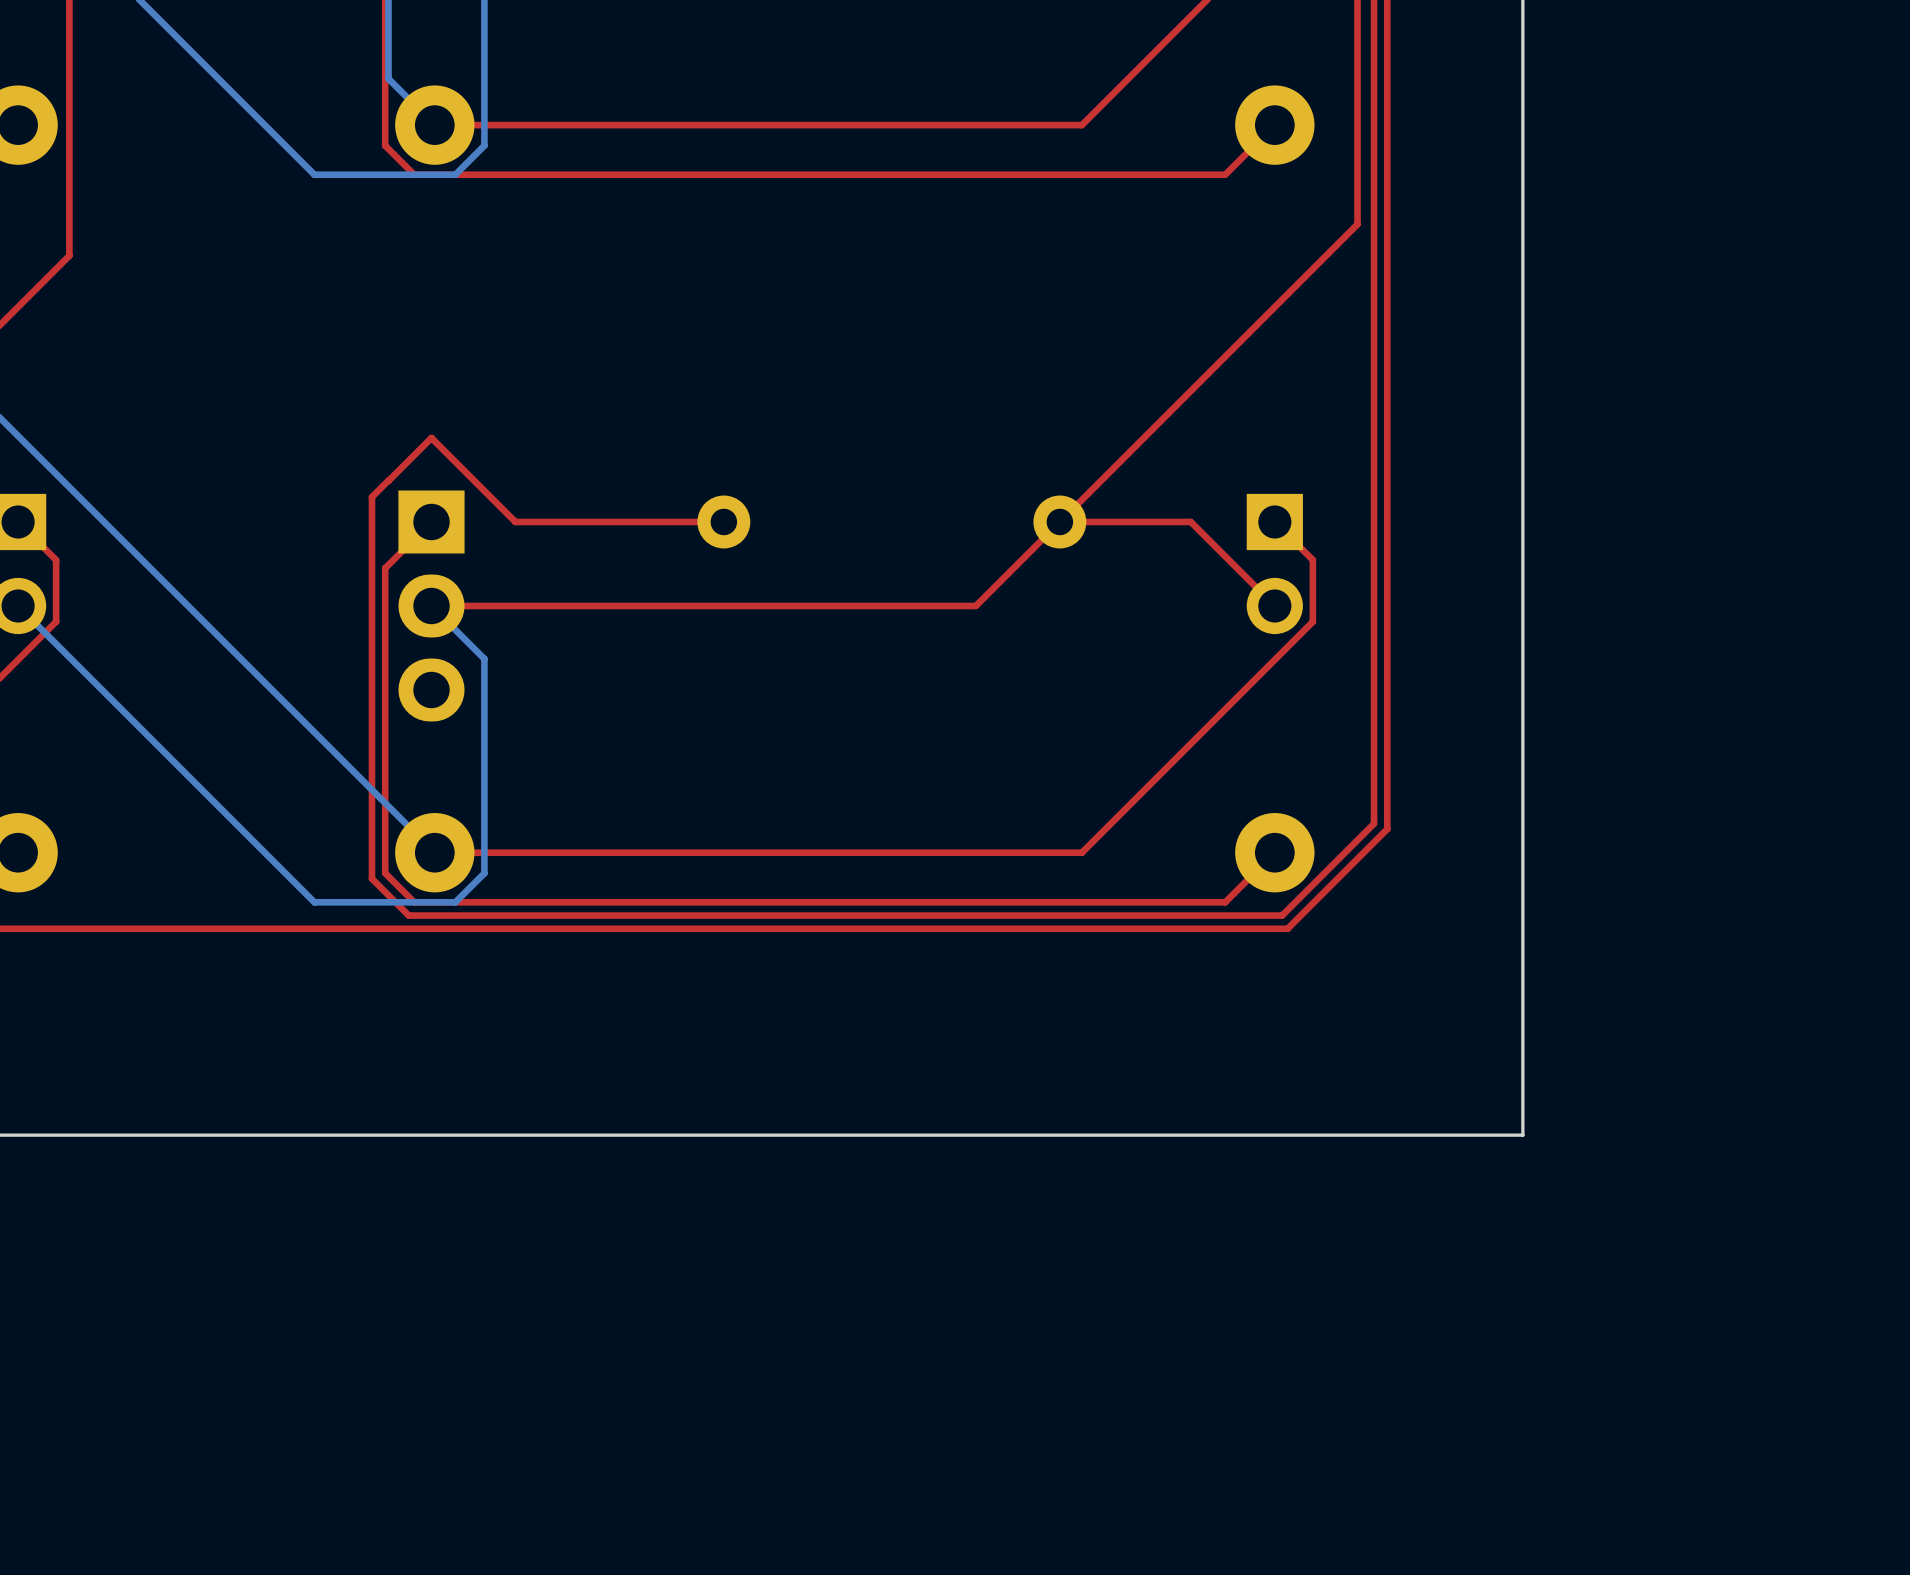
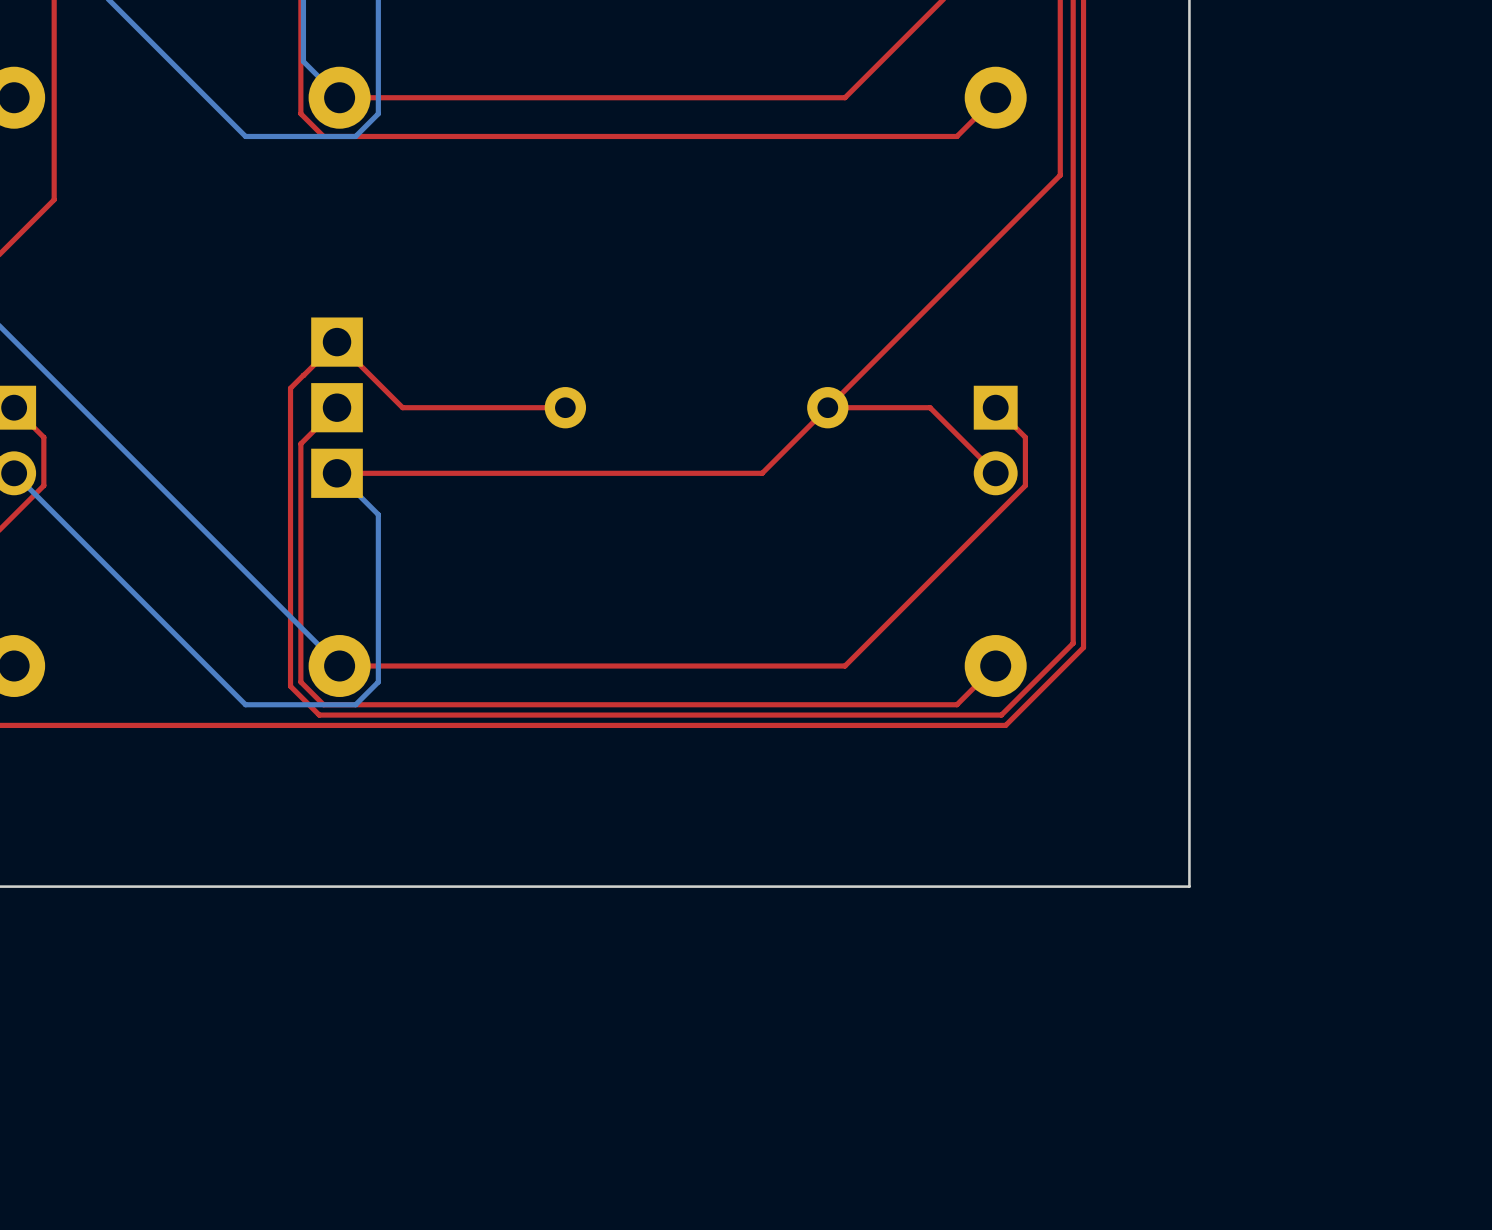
part: none -> (337, 407)
part: (431, 605) -> none

